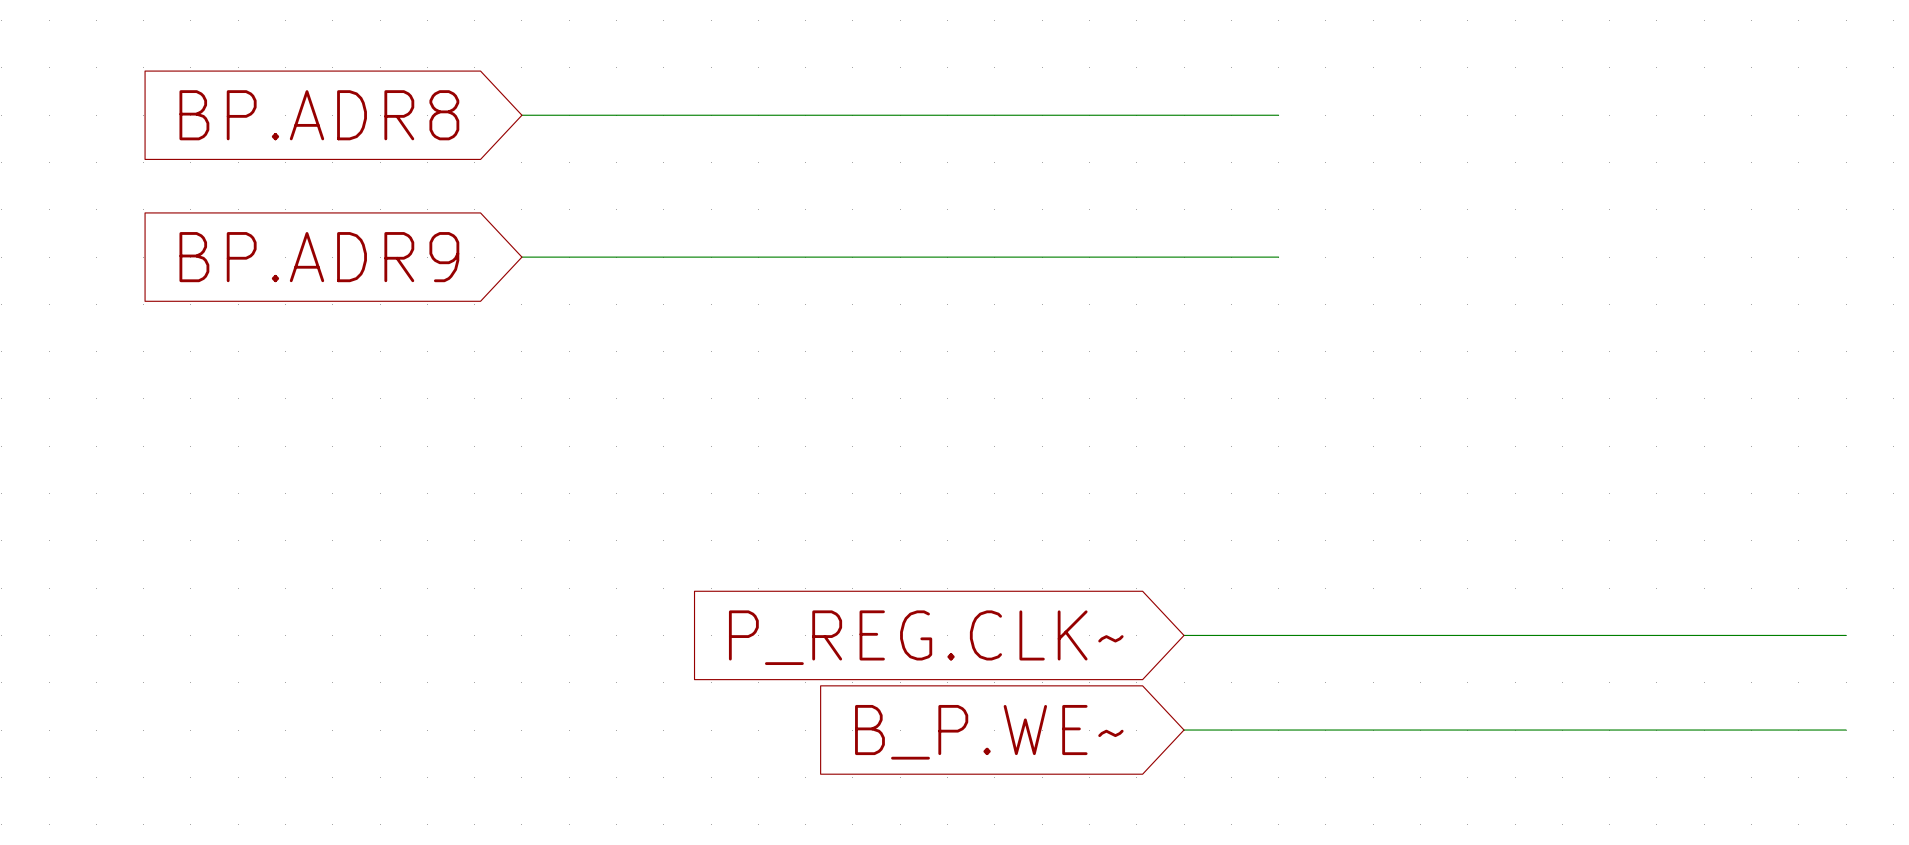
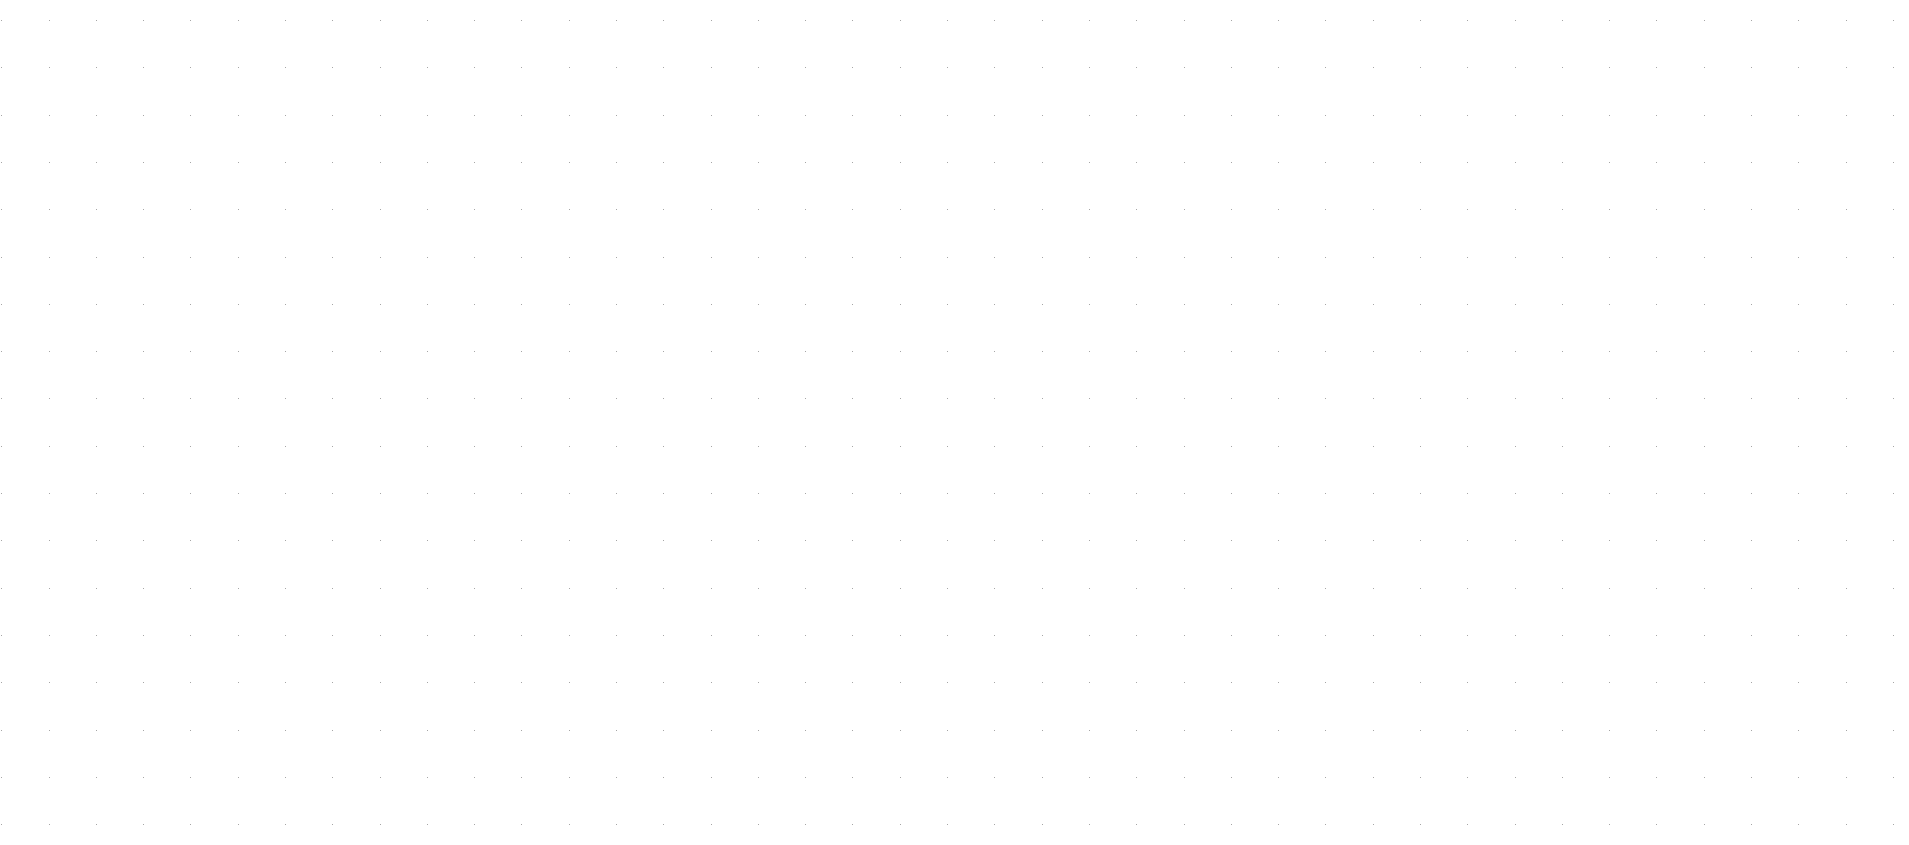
global label: BP.ADR8 (319, 115) -> none
wire: (521, 115) (1278, 115) -> none
global label: BP.ADR9 (319, 257) -> none
wire: (521, 257) (1278, 257) -> none
wire: (1184, 635) (1846, 635) -> none
global label: P_REG.CLK~ (926, 637) -> none
wire: (1184, 730) (1846, 730) -> none
global label: B_P.WE~ (989, 732) -> none

